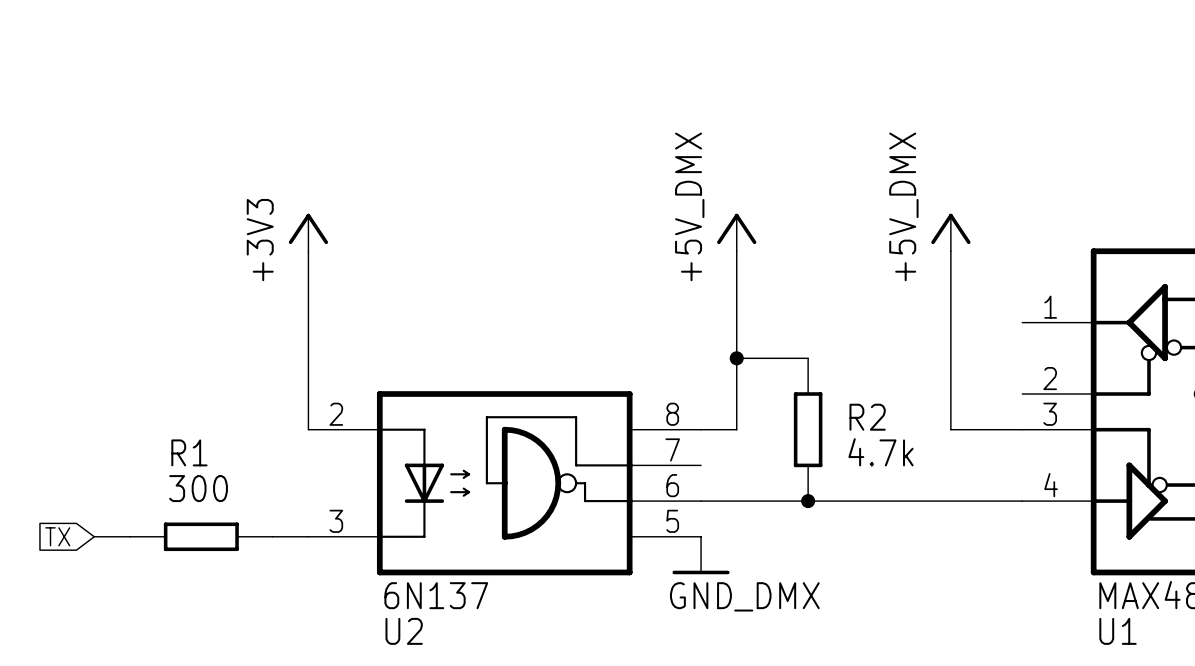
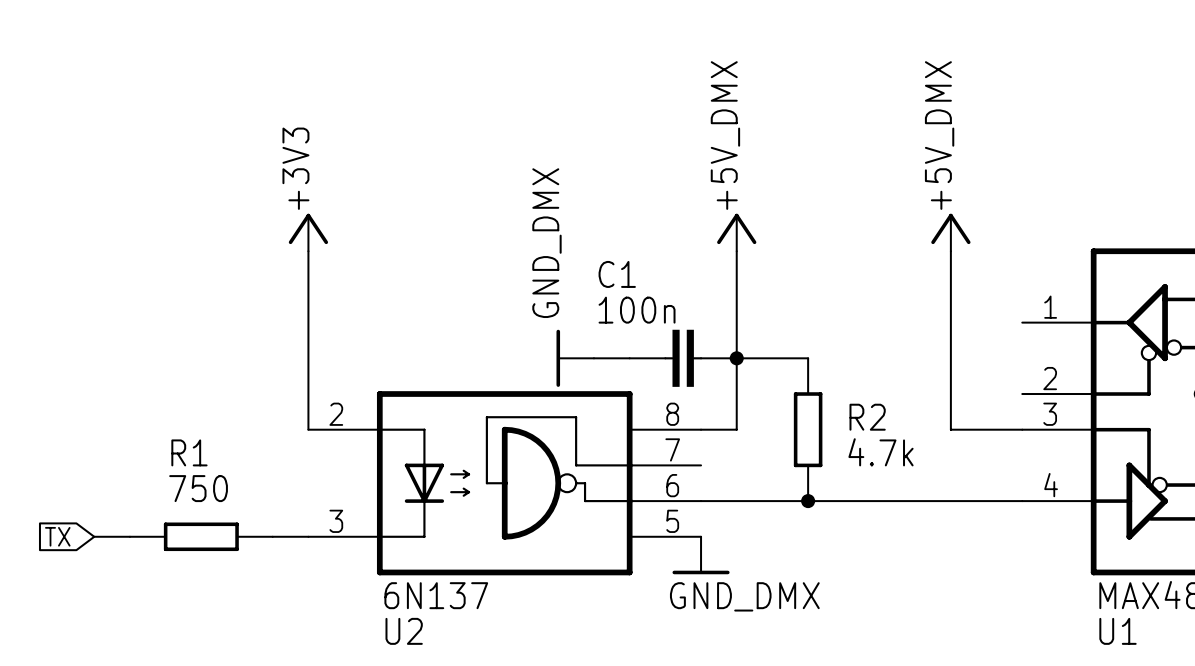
power symbol text position: +5V_DMX (689, 206) -> +5V_DMX (725, 135)
power symbol text position: +5V_DMX (903, 206) -> +5V_DMX (939, 135)
power symbol text position: +3V3 (260, 240) -> +3V3 (295, 168)
power symbol: none -> GND_DMX (575, 358)
wire: none -> (593, 358) (629, 358)
C1: none -> 100n (683, 358)
R1 value: 300 (198, 488) -> 750 (198, 488)

